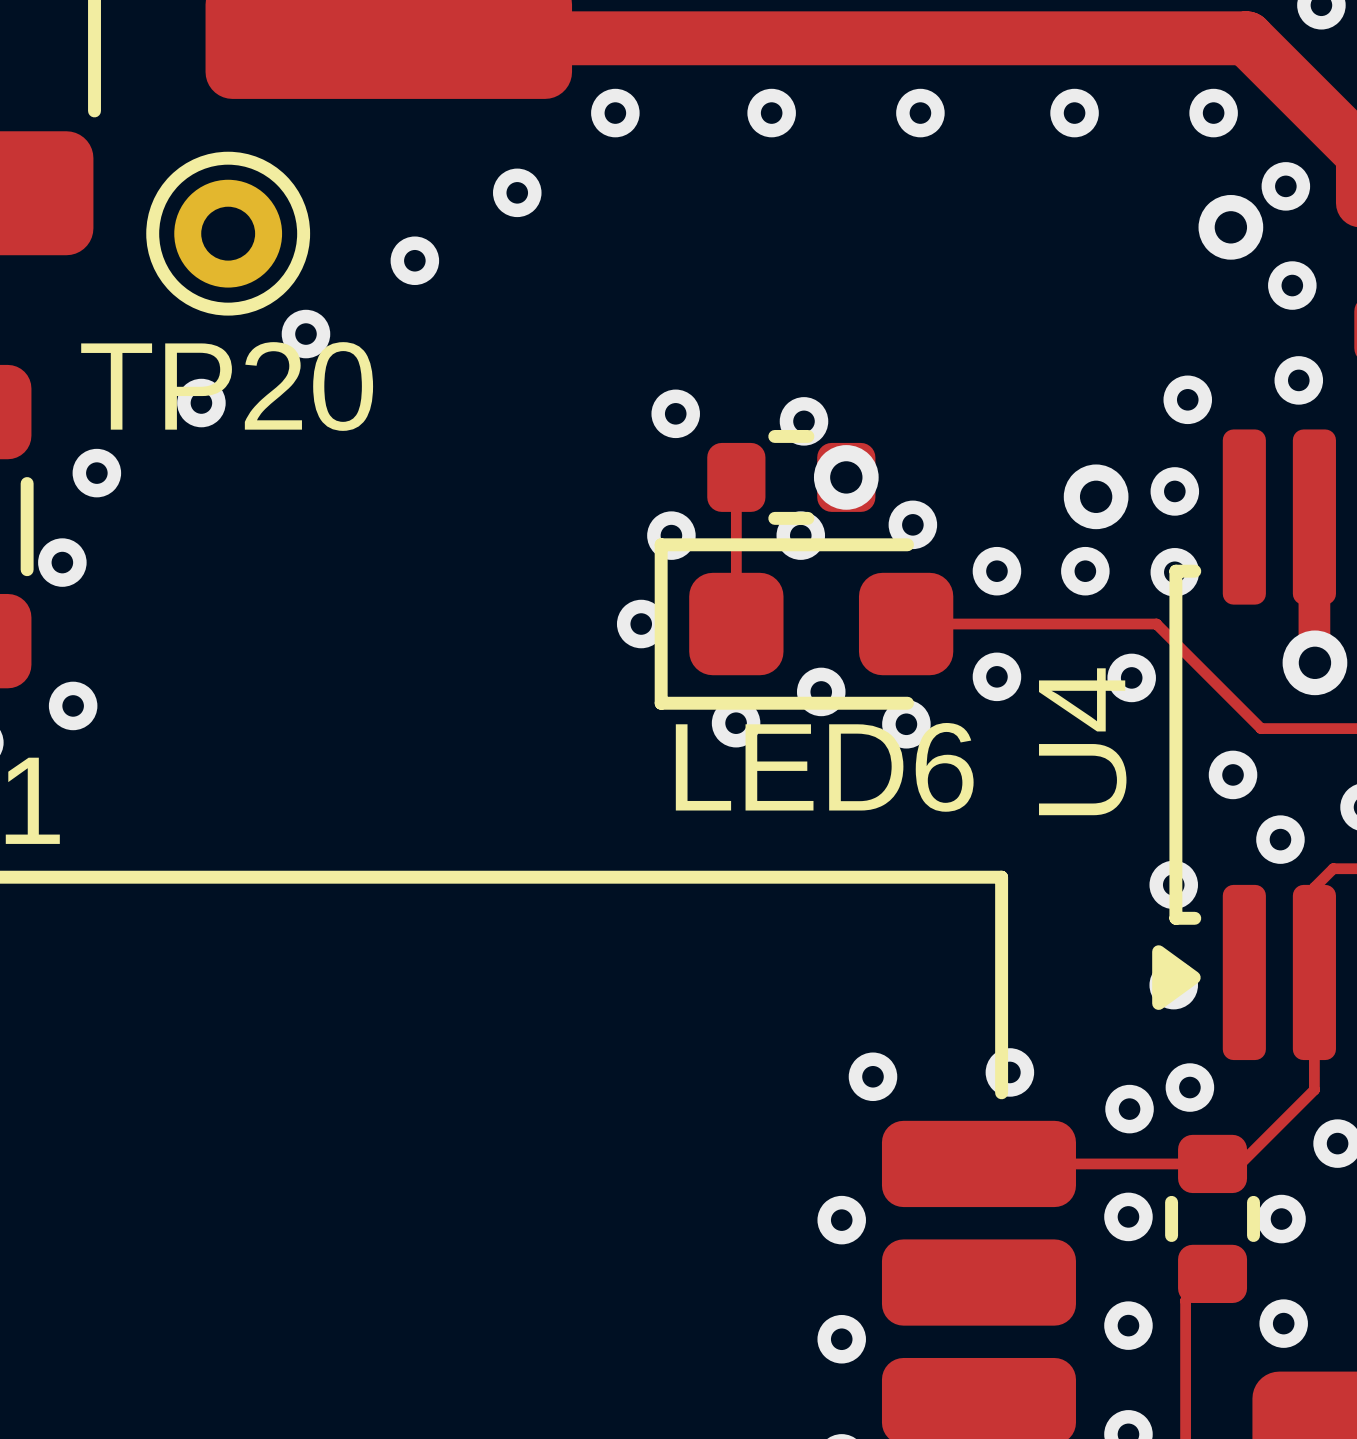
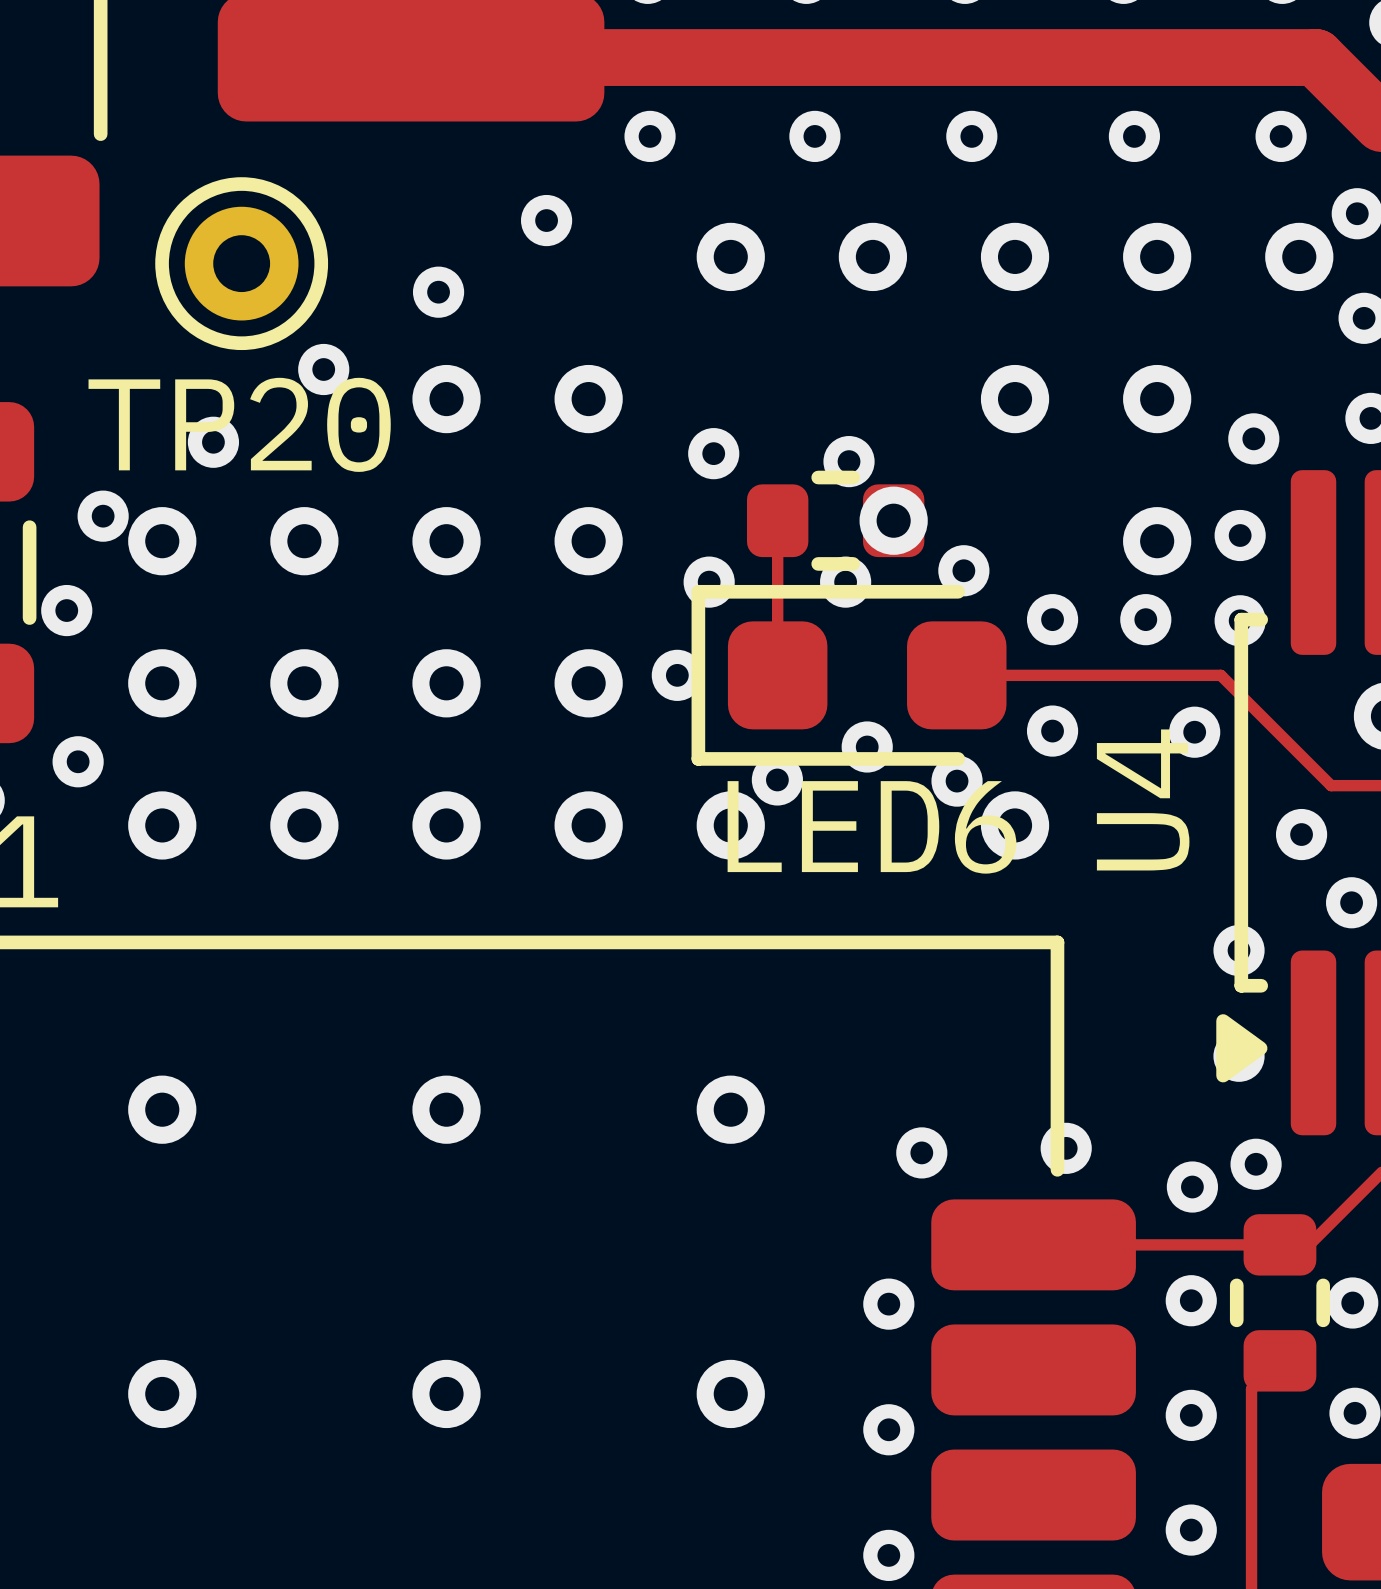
via: none -> (730, 256)
via: none -> (872, 256)
via: none -> (1015, 256)
via: none -> (1157, 256)
via: none -> (446, 399)
via: none -> (588, 399)
via: none -> (1015, 399)
via: none -> (1157, 399)
via: none -> (162, 541)
via: none -> (304, 541)
via: none -> (446, 541)
via: none -> (588, 541)
via: none -> (162, 683)
via: none -> (304, 683)
via: none -> (446, 683)
via: none -> (588, 683)
via: none -> (162, 825)
via: none -> (304, 825)
via: none -> (446, 825)
via: none -> (588, 825)
via: none -> (730, 825)
via: none -> (1015, 825)
via: none -> (162, 1109)
via: none -> (446, 1109)
via: none -> (730, 1109)
via: none -> (162, 1393)
via: none -> (446, 1393)
via: none -> (730, 1393)

